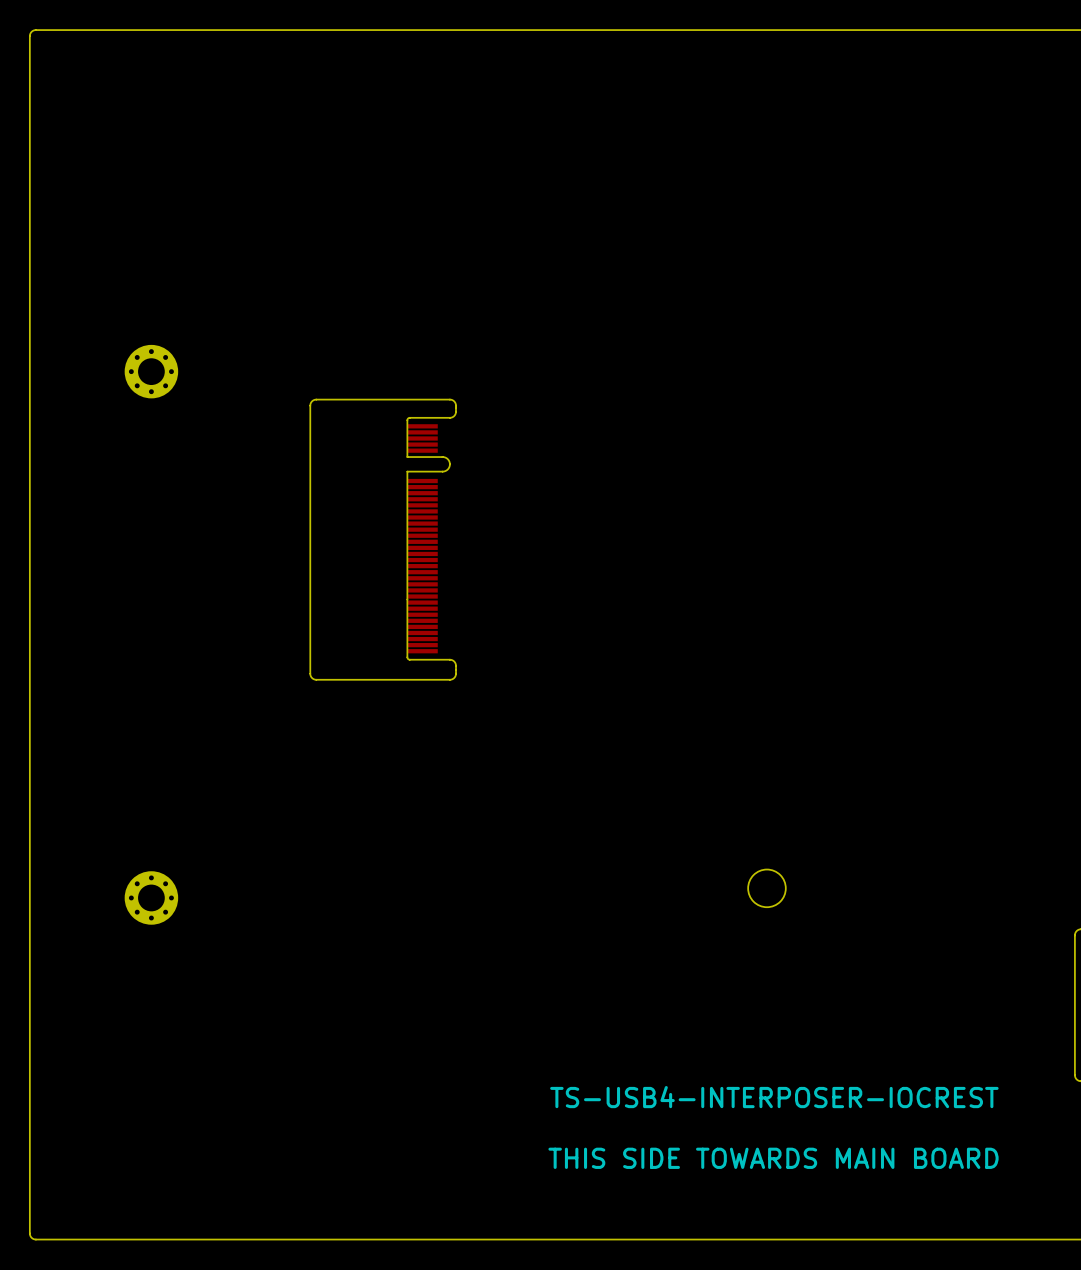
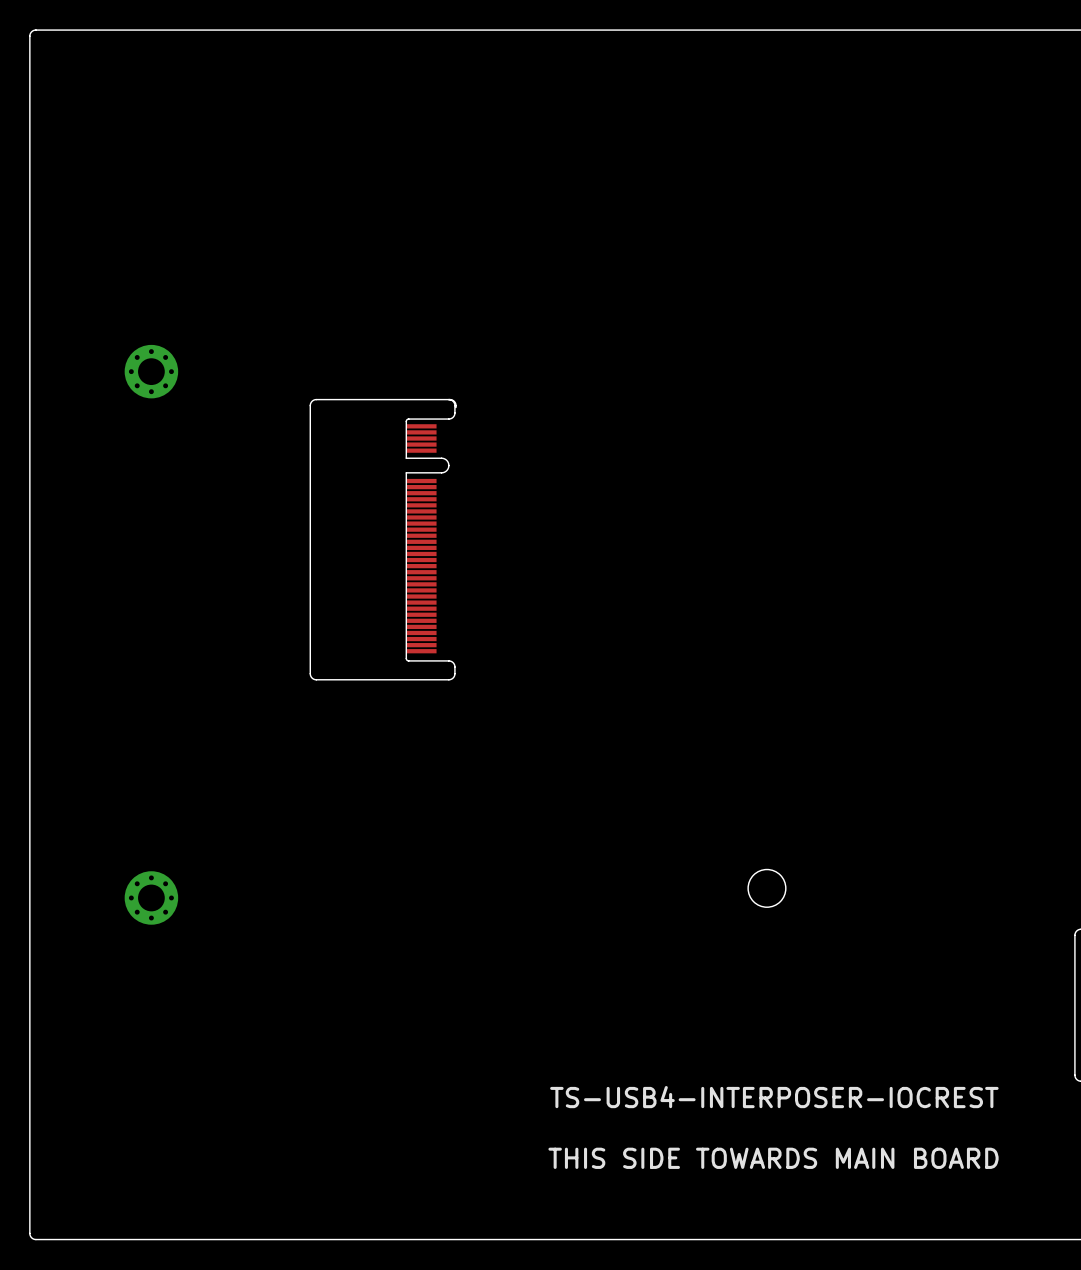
part footprint: [407, 407, 457, 671] -> [406, 424, 437, 654]
board edge: (456, 670) (454, 677) (448, 679) -> (448, 399) (452, 400) (454, 404) (454, 414) (451, 418) (408, 419) (406, 421) (406, 458) (442, 458) (447, 461) (448, 465) (446, 470) (442, 472) (406, 472) (406, 658) (408, 660) (451, 661) (454, 665) (454, 674) (448, 679)

